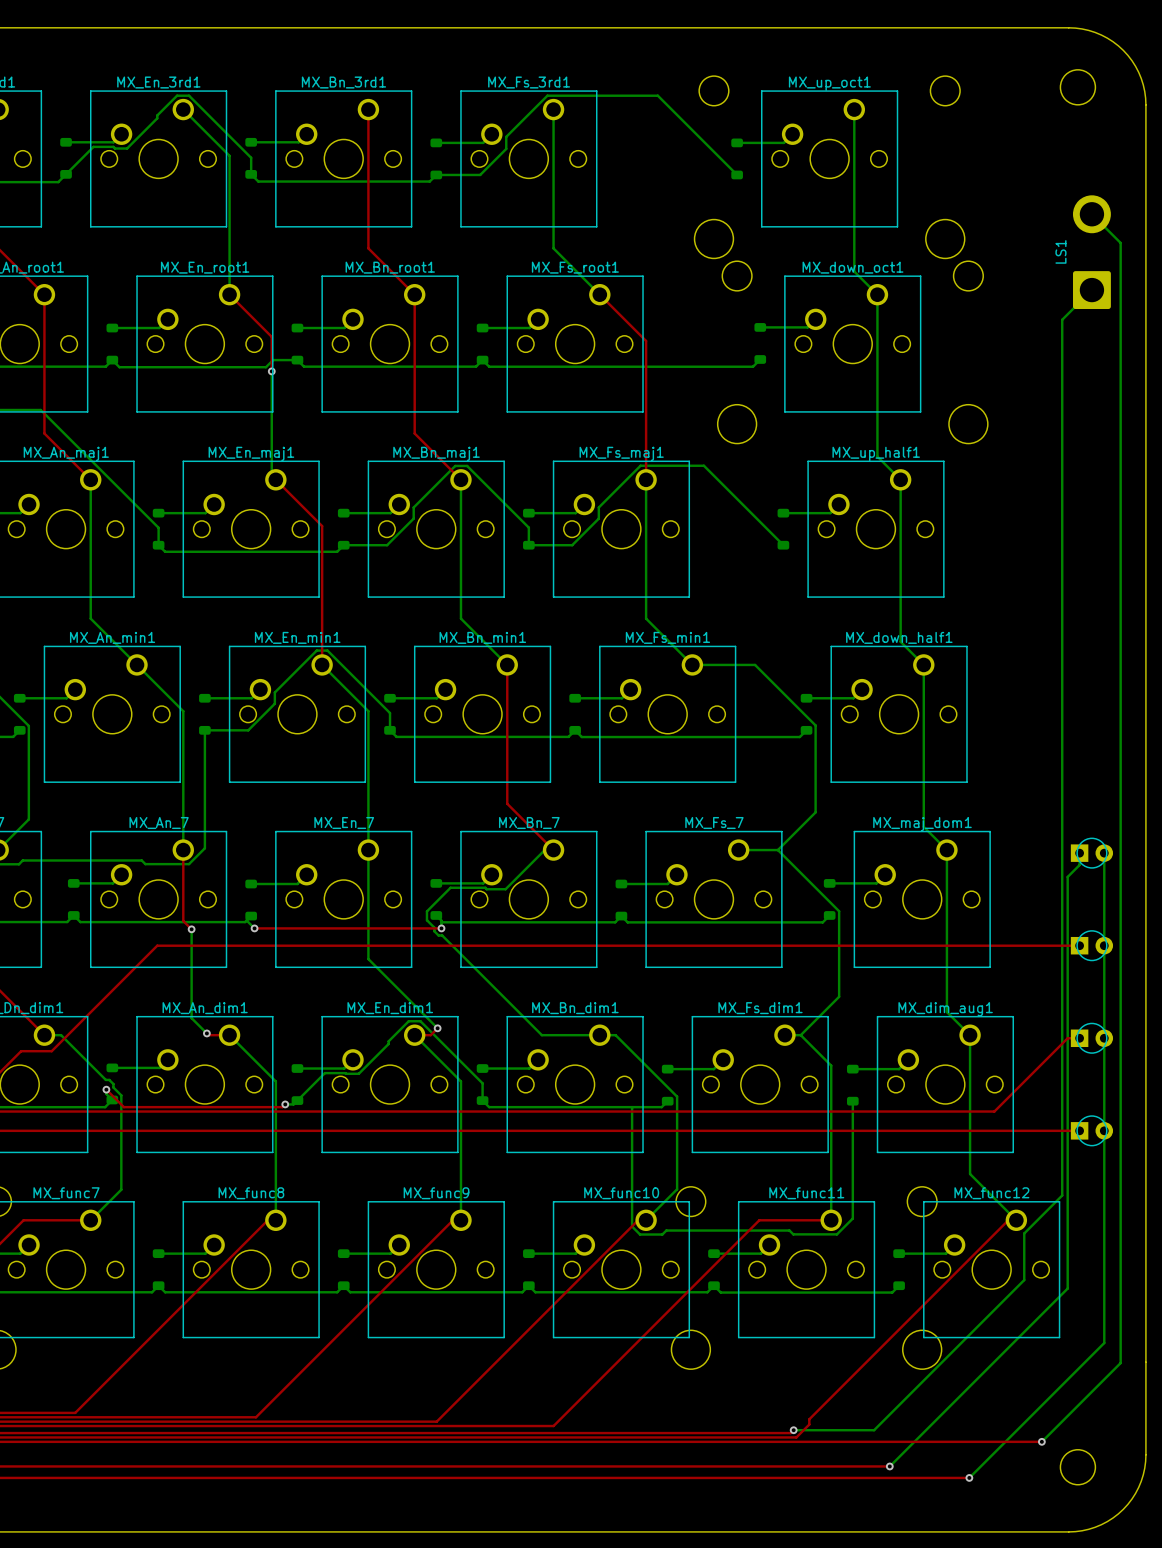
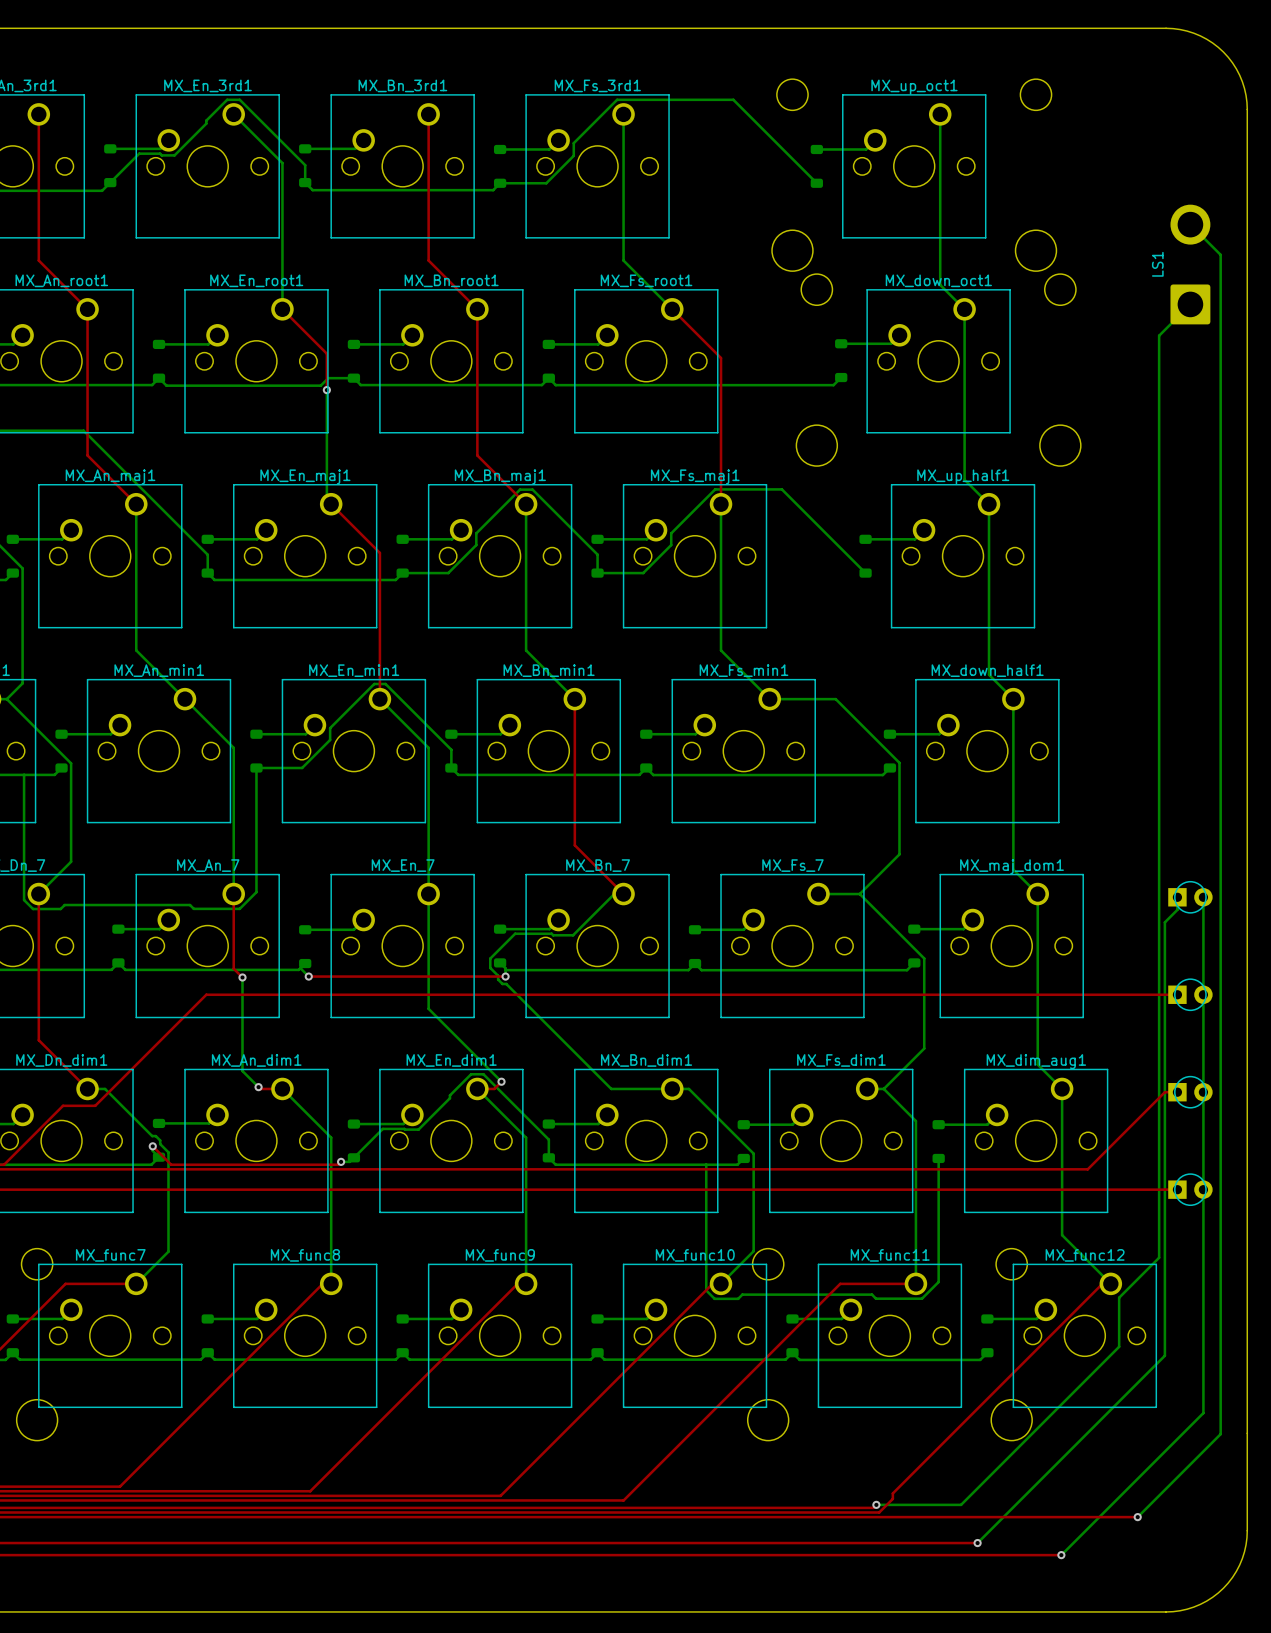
round board edge: [1059, 69, 1096, 106] -> none
round board edge: [1059, 1449, 1096, 1486] -> none

